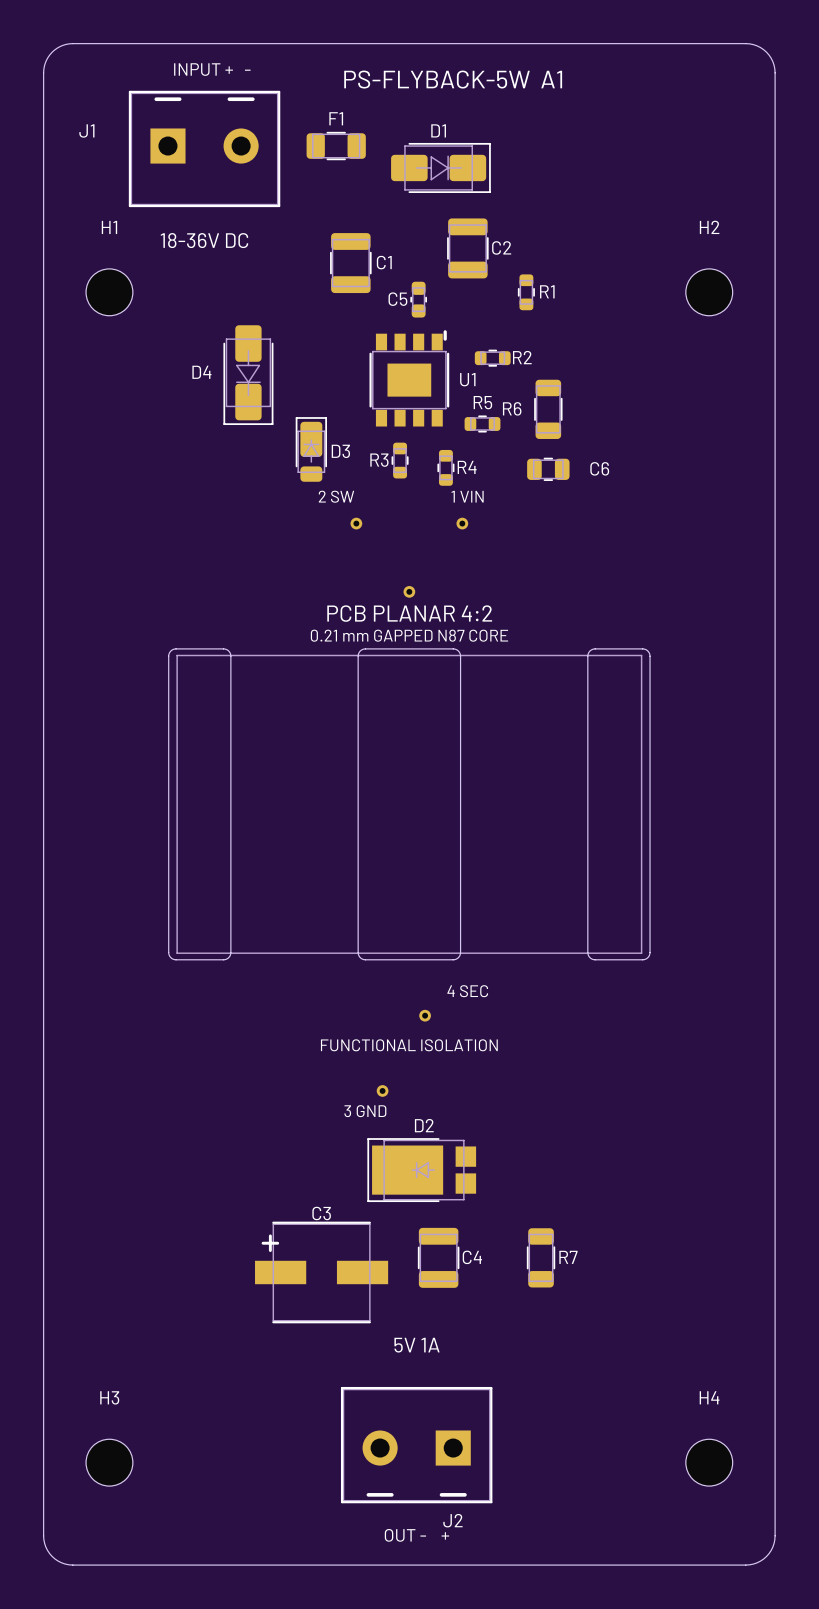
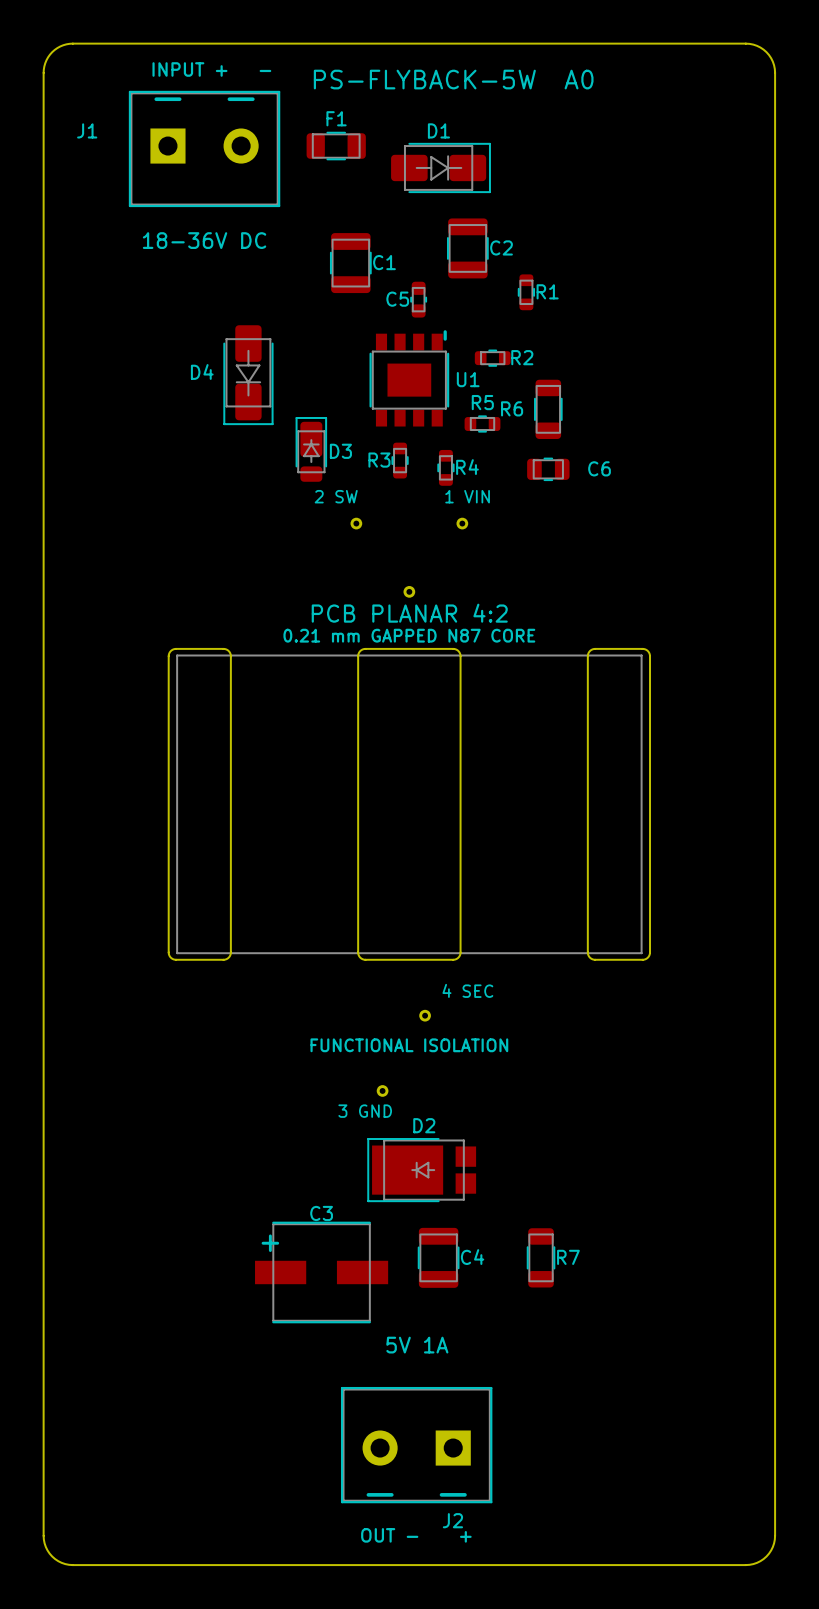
text: PS-FLYBACK-5W A1 (453, 79) -> PS-FLYBACK-5W A0 (453, 79)
H1: (109, 292) -> none
H2: (709, 292) -> none
H3: (109, 1462) -> none
H4: (709, 1462) -> none

